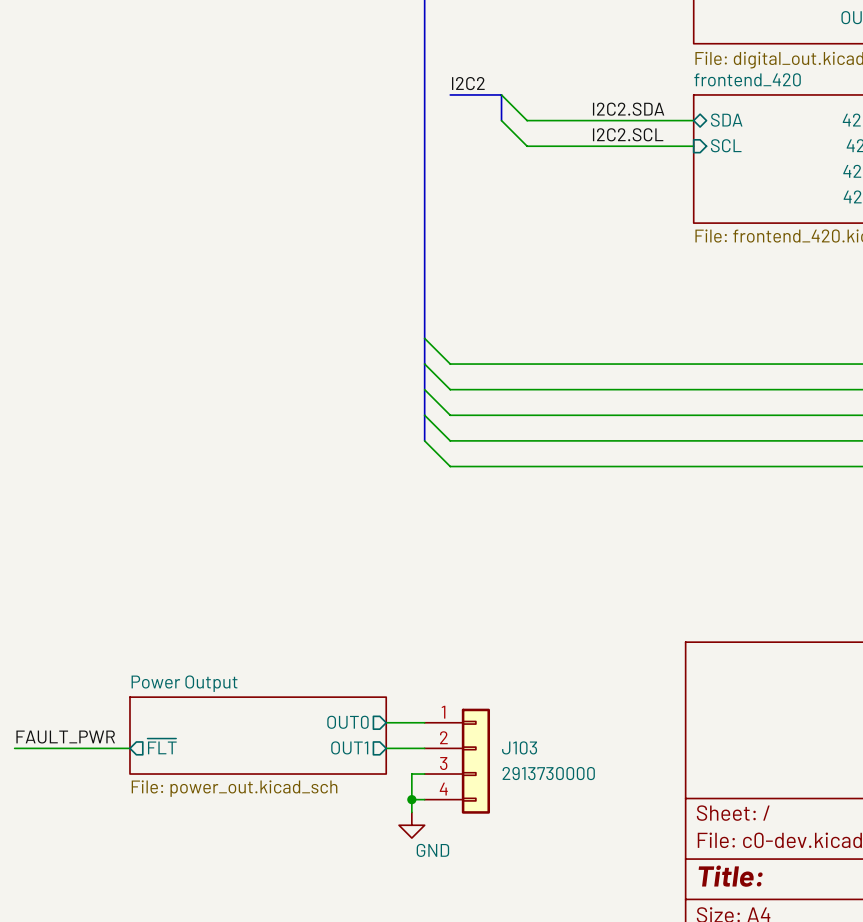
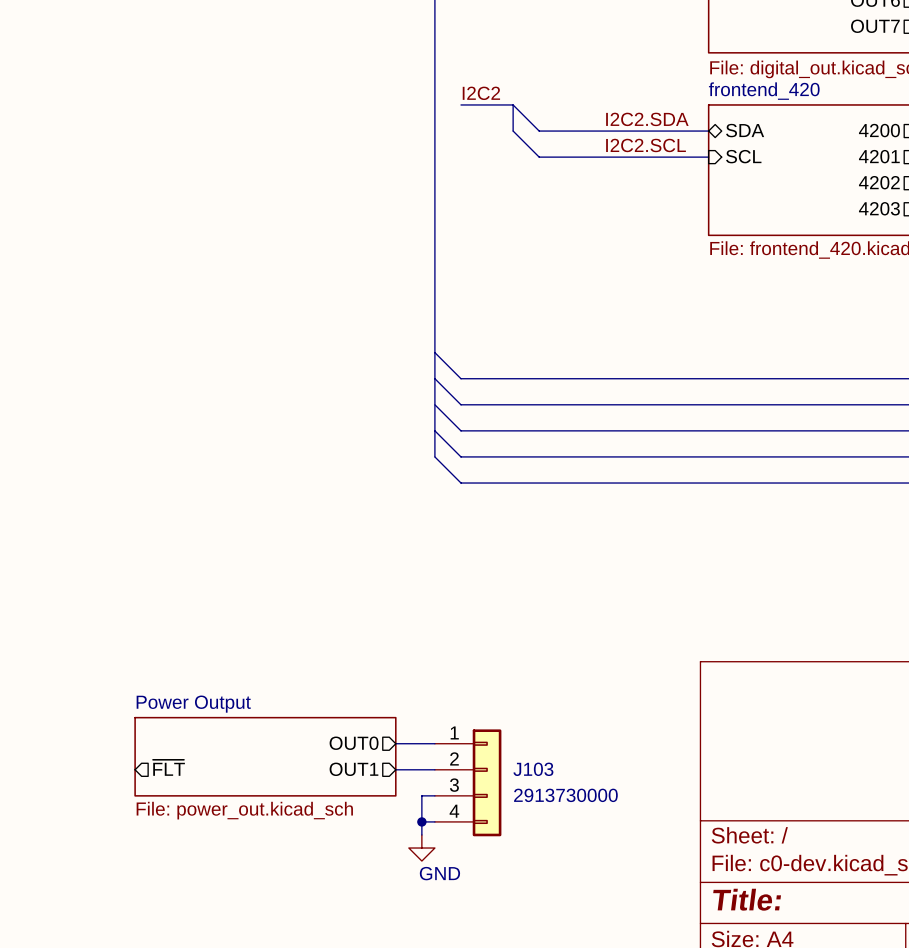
label: FAULT_PWR (65, 737) -> none
wire: (14, 748) (129, 748) -> none

